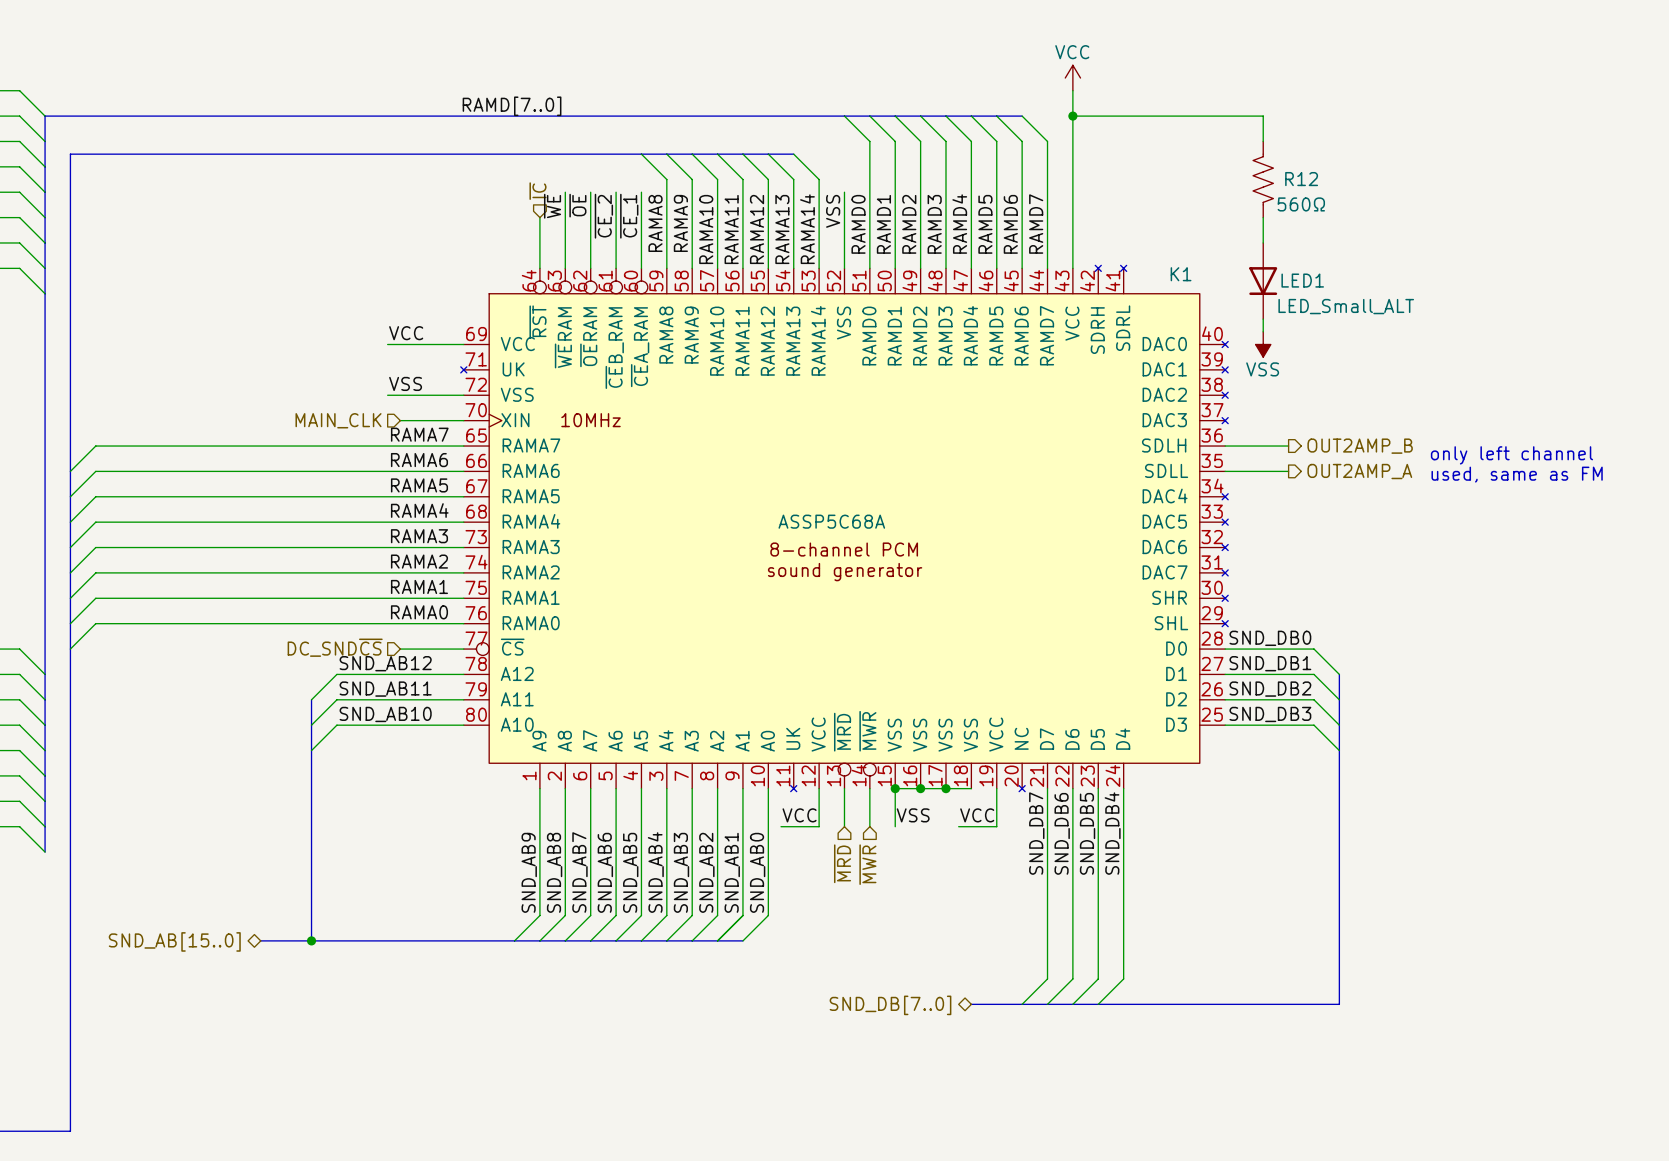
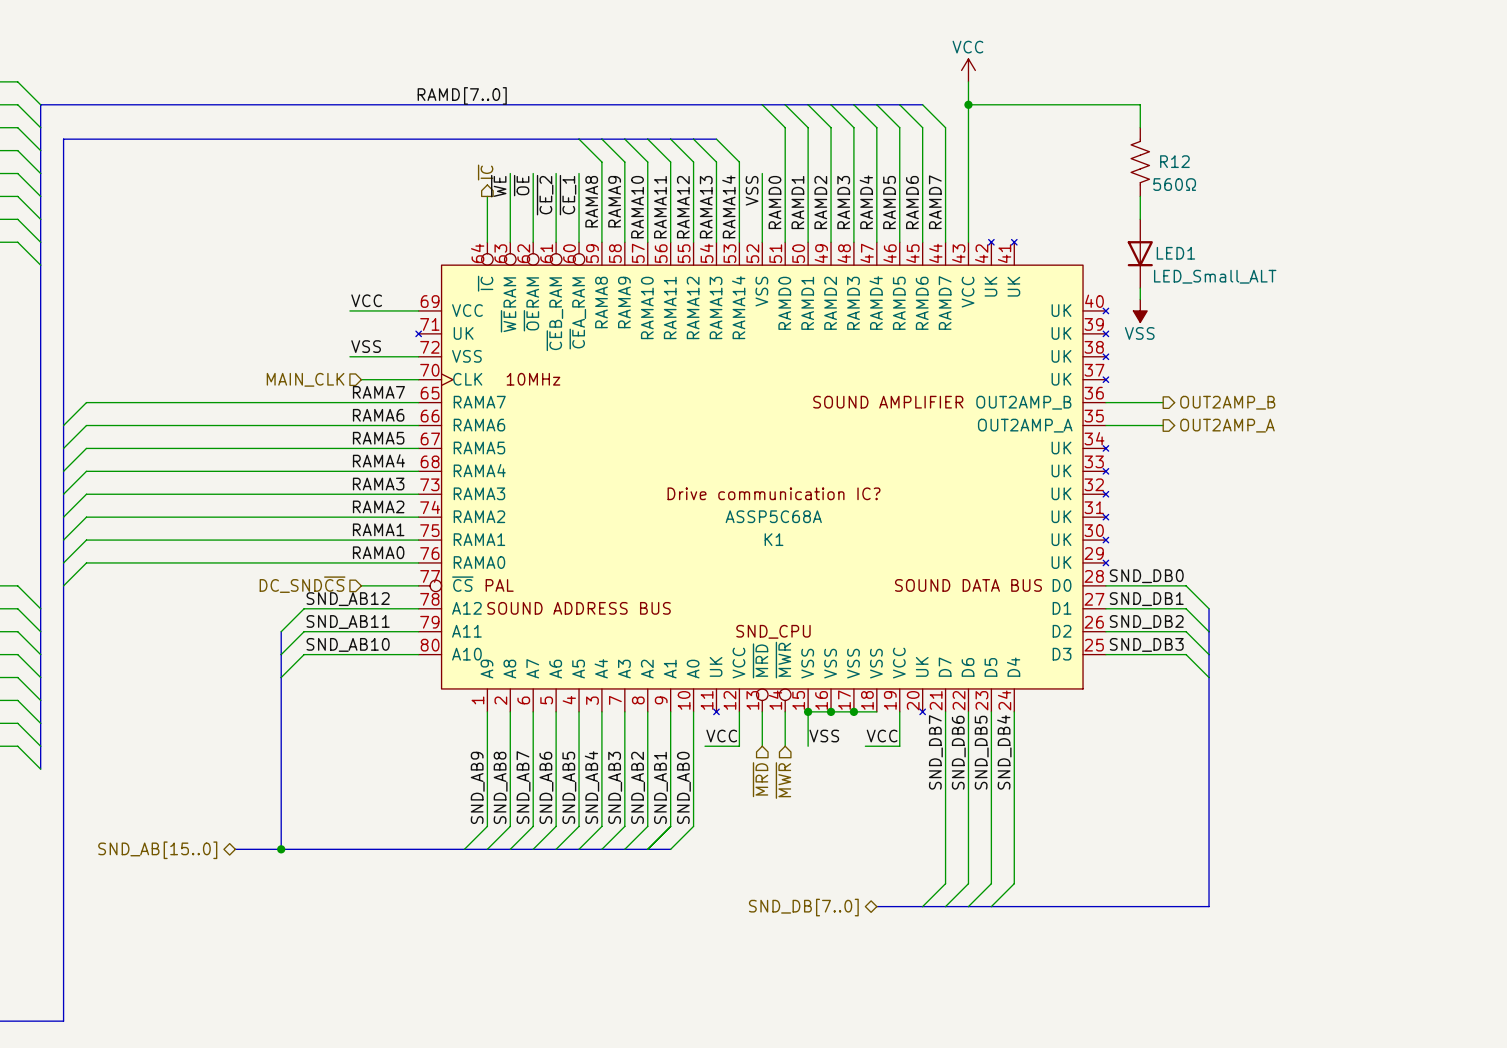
hierarchical label shape: input (538, 191) -> output (485, 172)
K1 symbol: [460, 265, 1229, 792] -> [415, 239, 1109, 715]
K1 name position: K1 (1181, 274) -> K1 (774, 539)
text: only left channel (1511, 455) -> none
text: used, same as FM (1517, 474) -> none
K1 value position: ASSP5C68A (831, 521) -> ASSP5C68A (773, 516)

